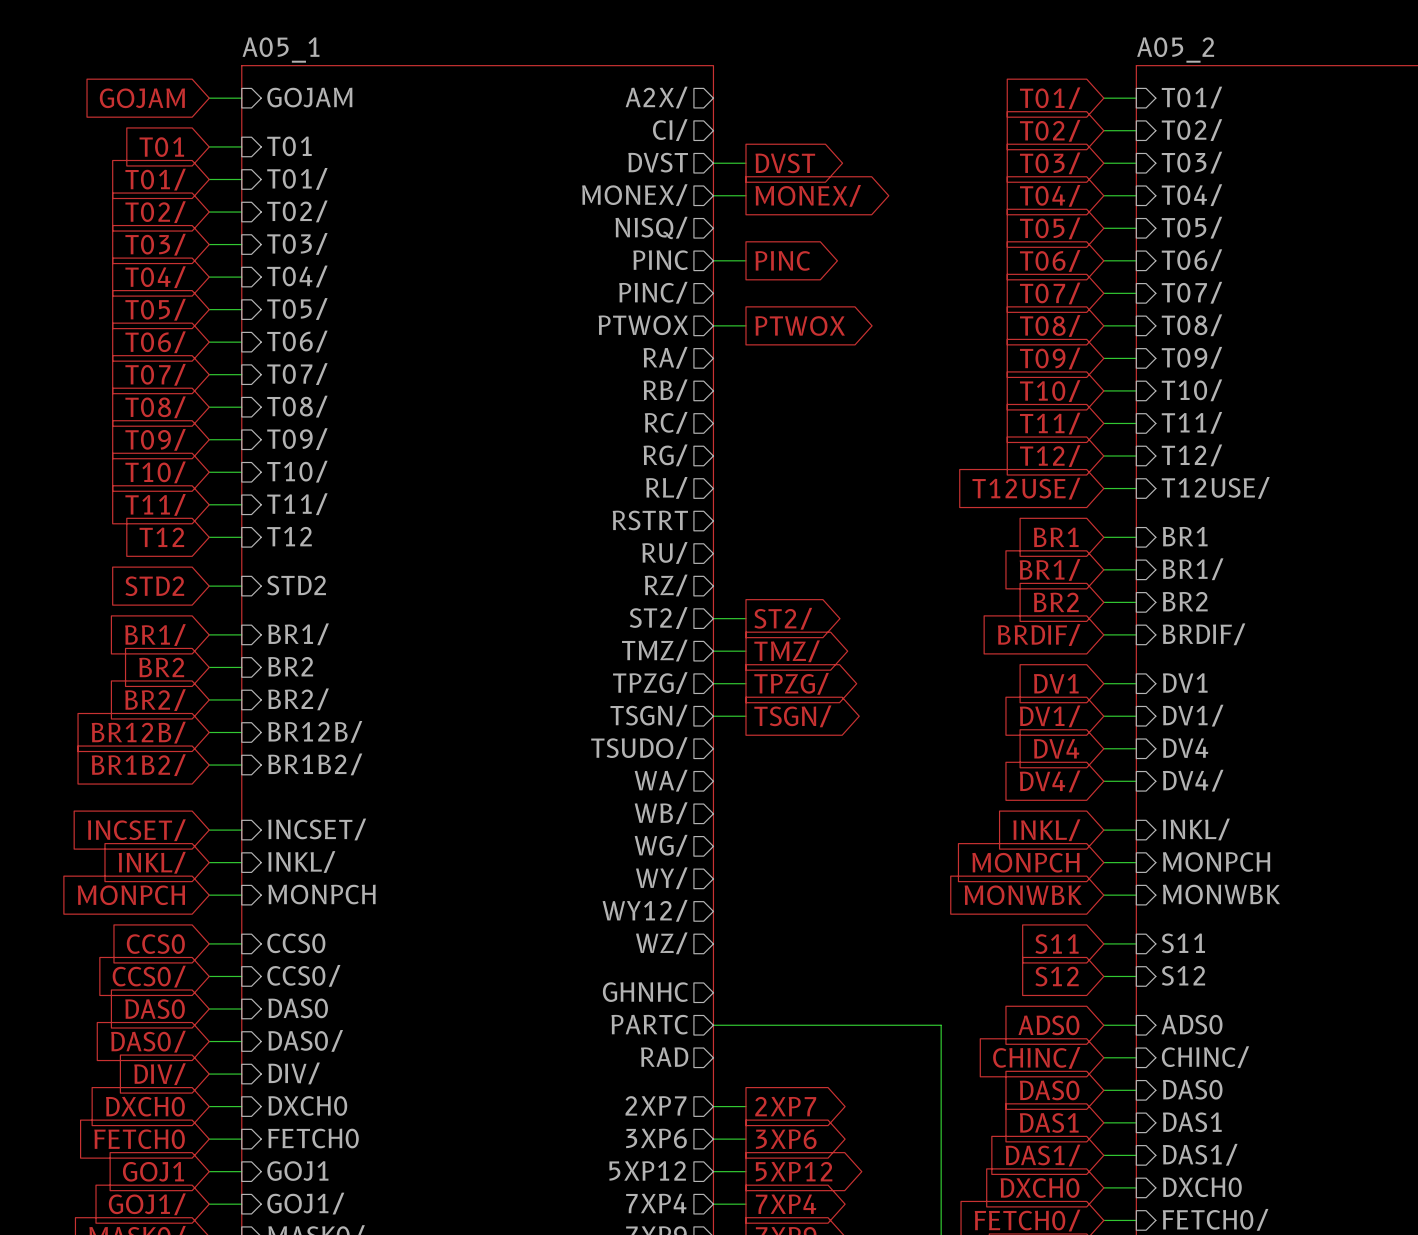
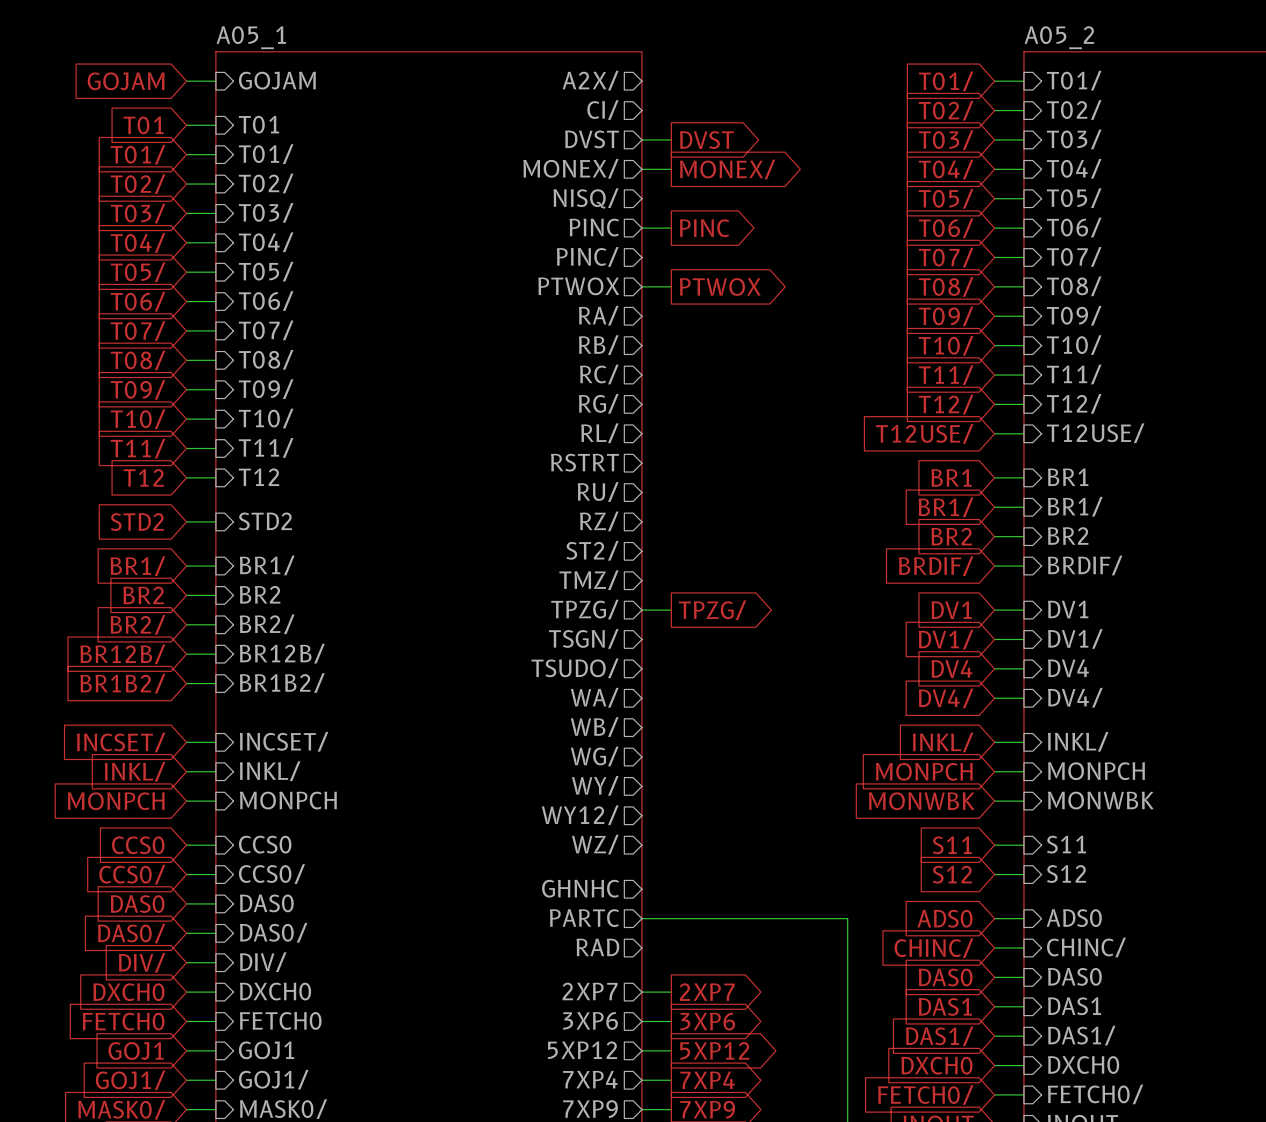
wire: (713, 618) (745, 618) -> none
global label: ST2/ (783, 618) -> none
wire: (713, 651) (745, 651) -> none
global label: TMZ/ (787, 651) -> none
wire: (713, 716) (745, 716) -> none
global label: TSGN/ (792, 716) -> none

